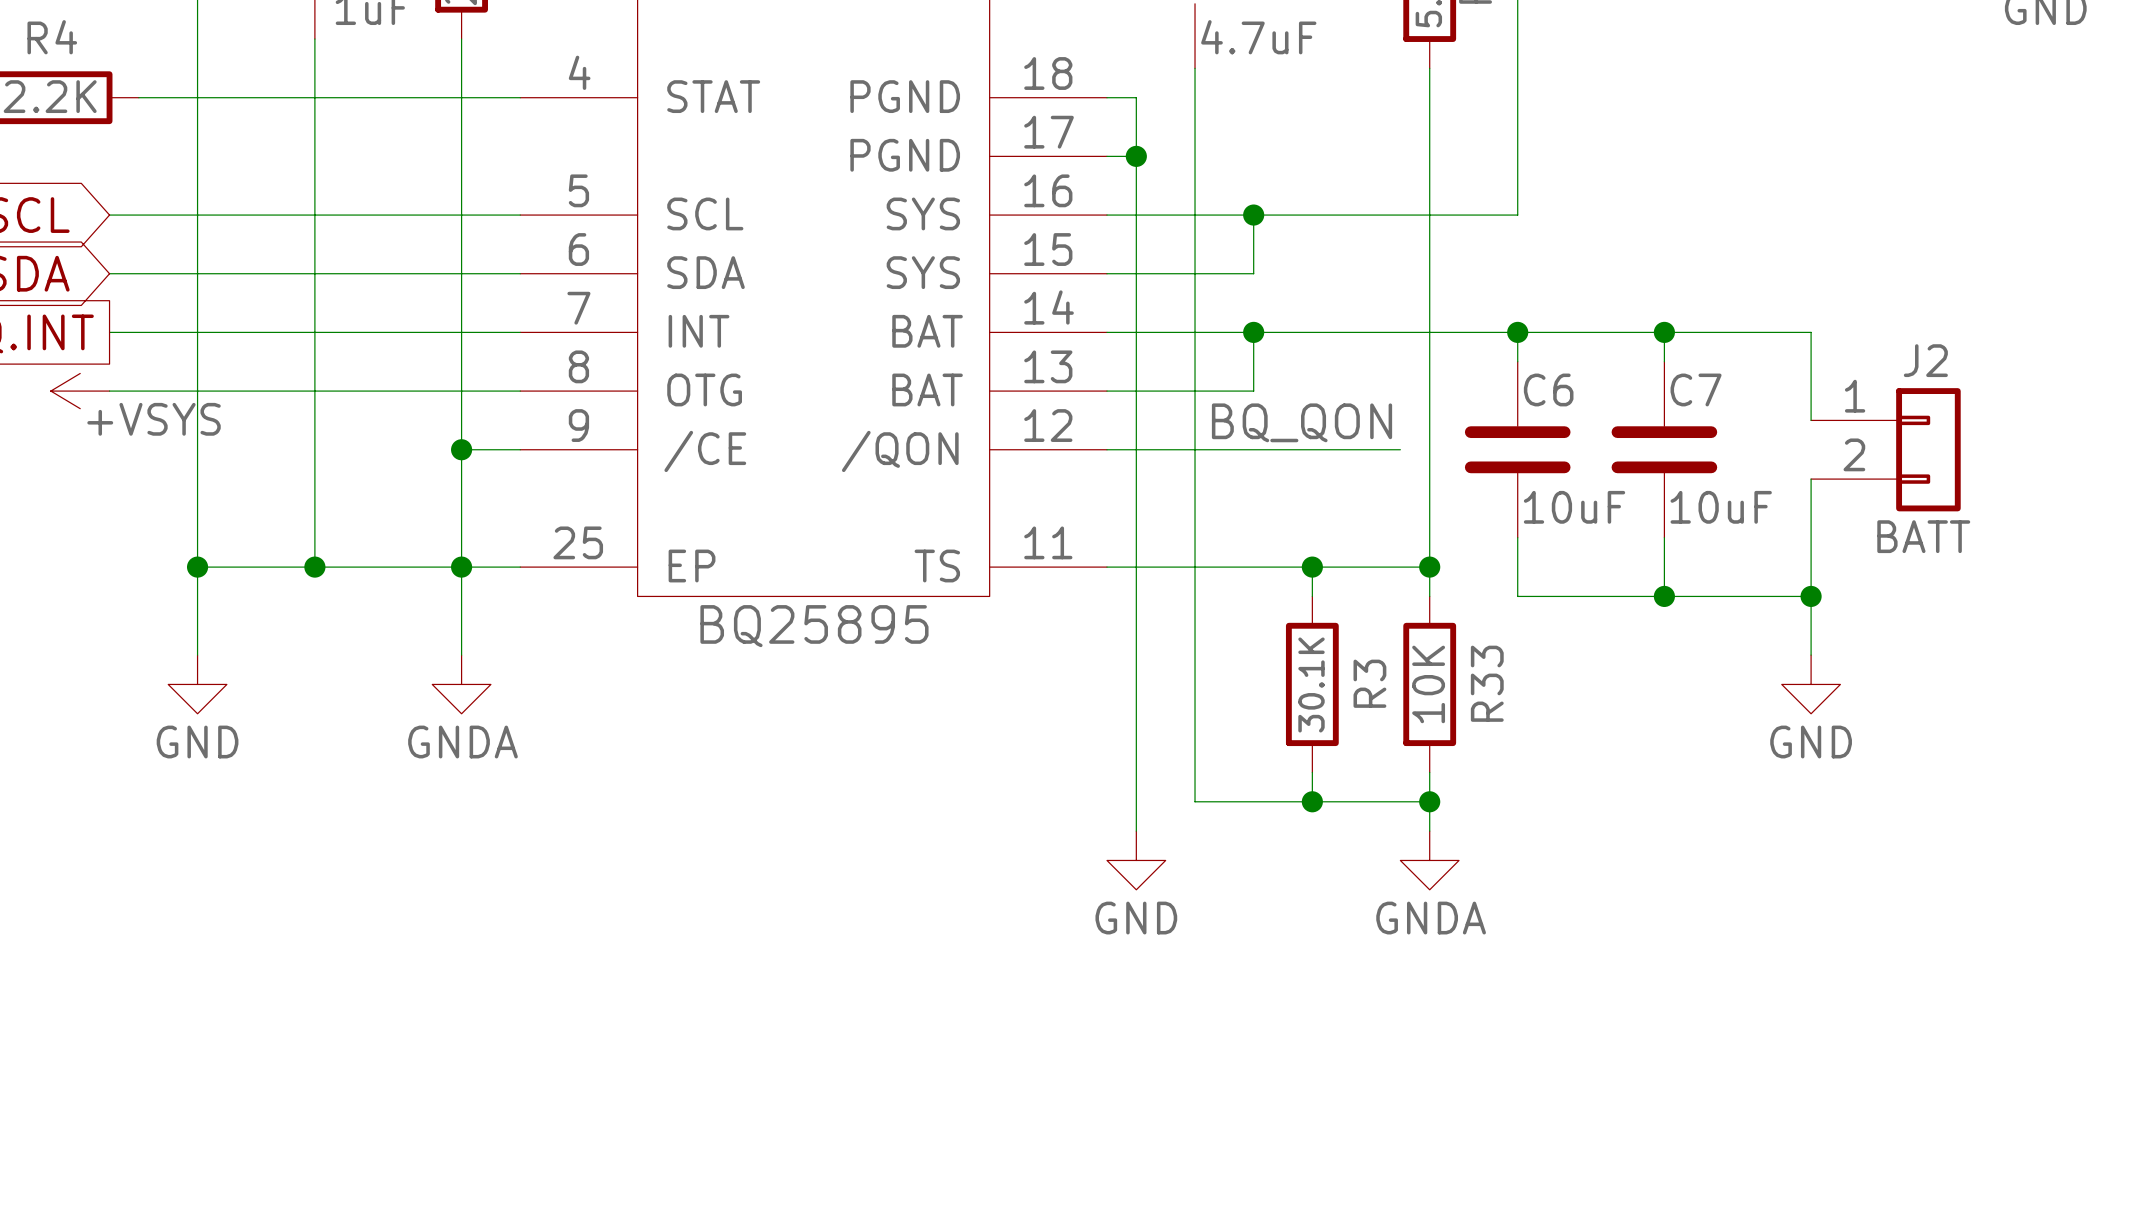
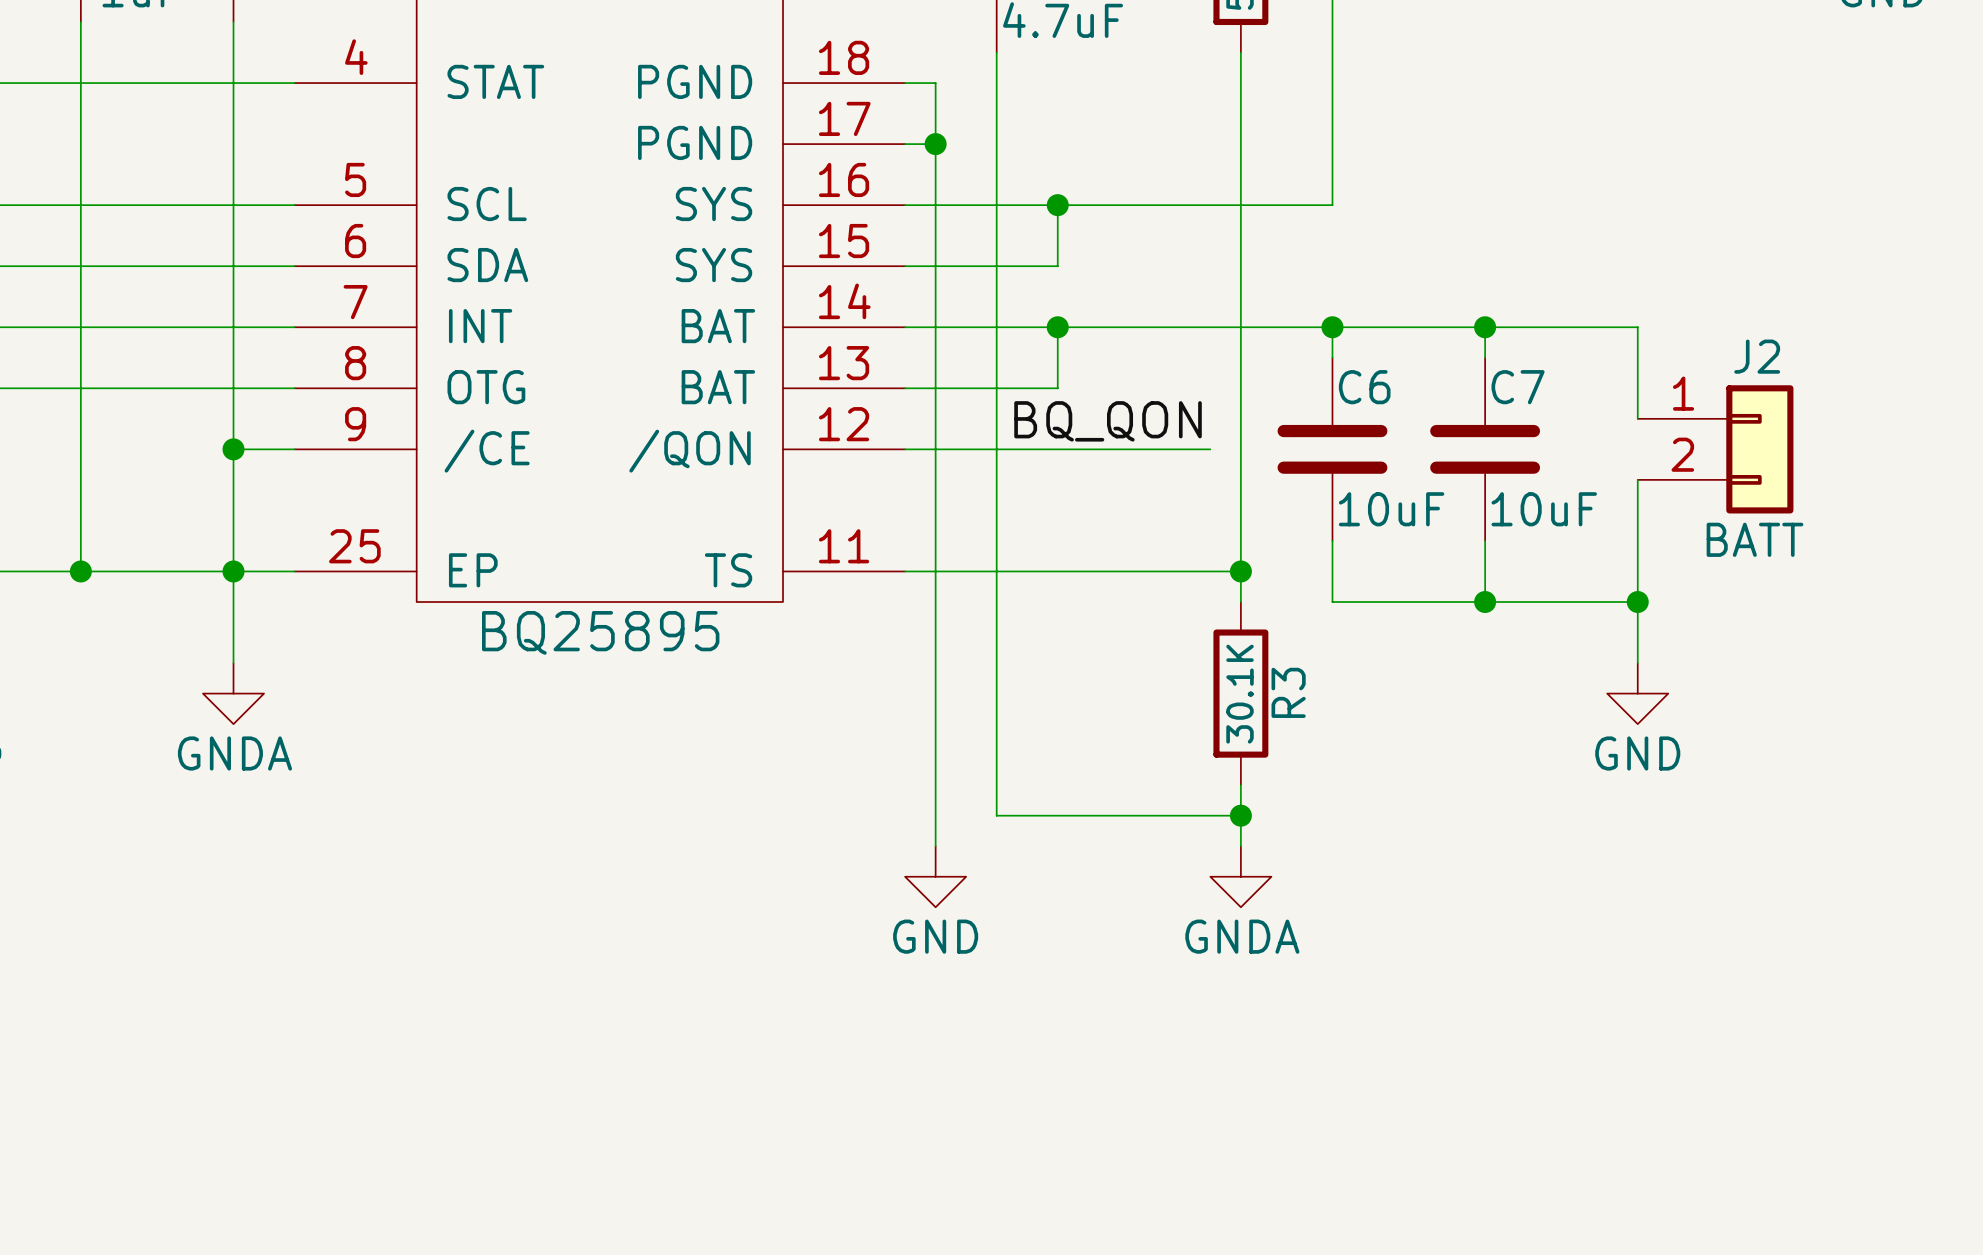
wire: (1312, 567) (1312, 596) -> none
junction: (1312, 567) -> none
R33 name: R33 (1487, 683) -> R3 (1288, 692)
R3: 30.1K (1312, 684) -> none
R33 value: 10K (1428, 684) -> 30.1K (1240, 694)
wire: (1312, 772) (1312, 801) -> none
junction: (1312, 801) -> none

